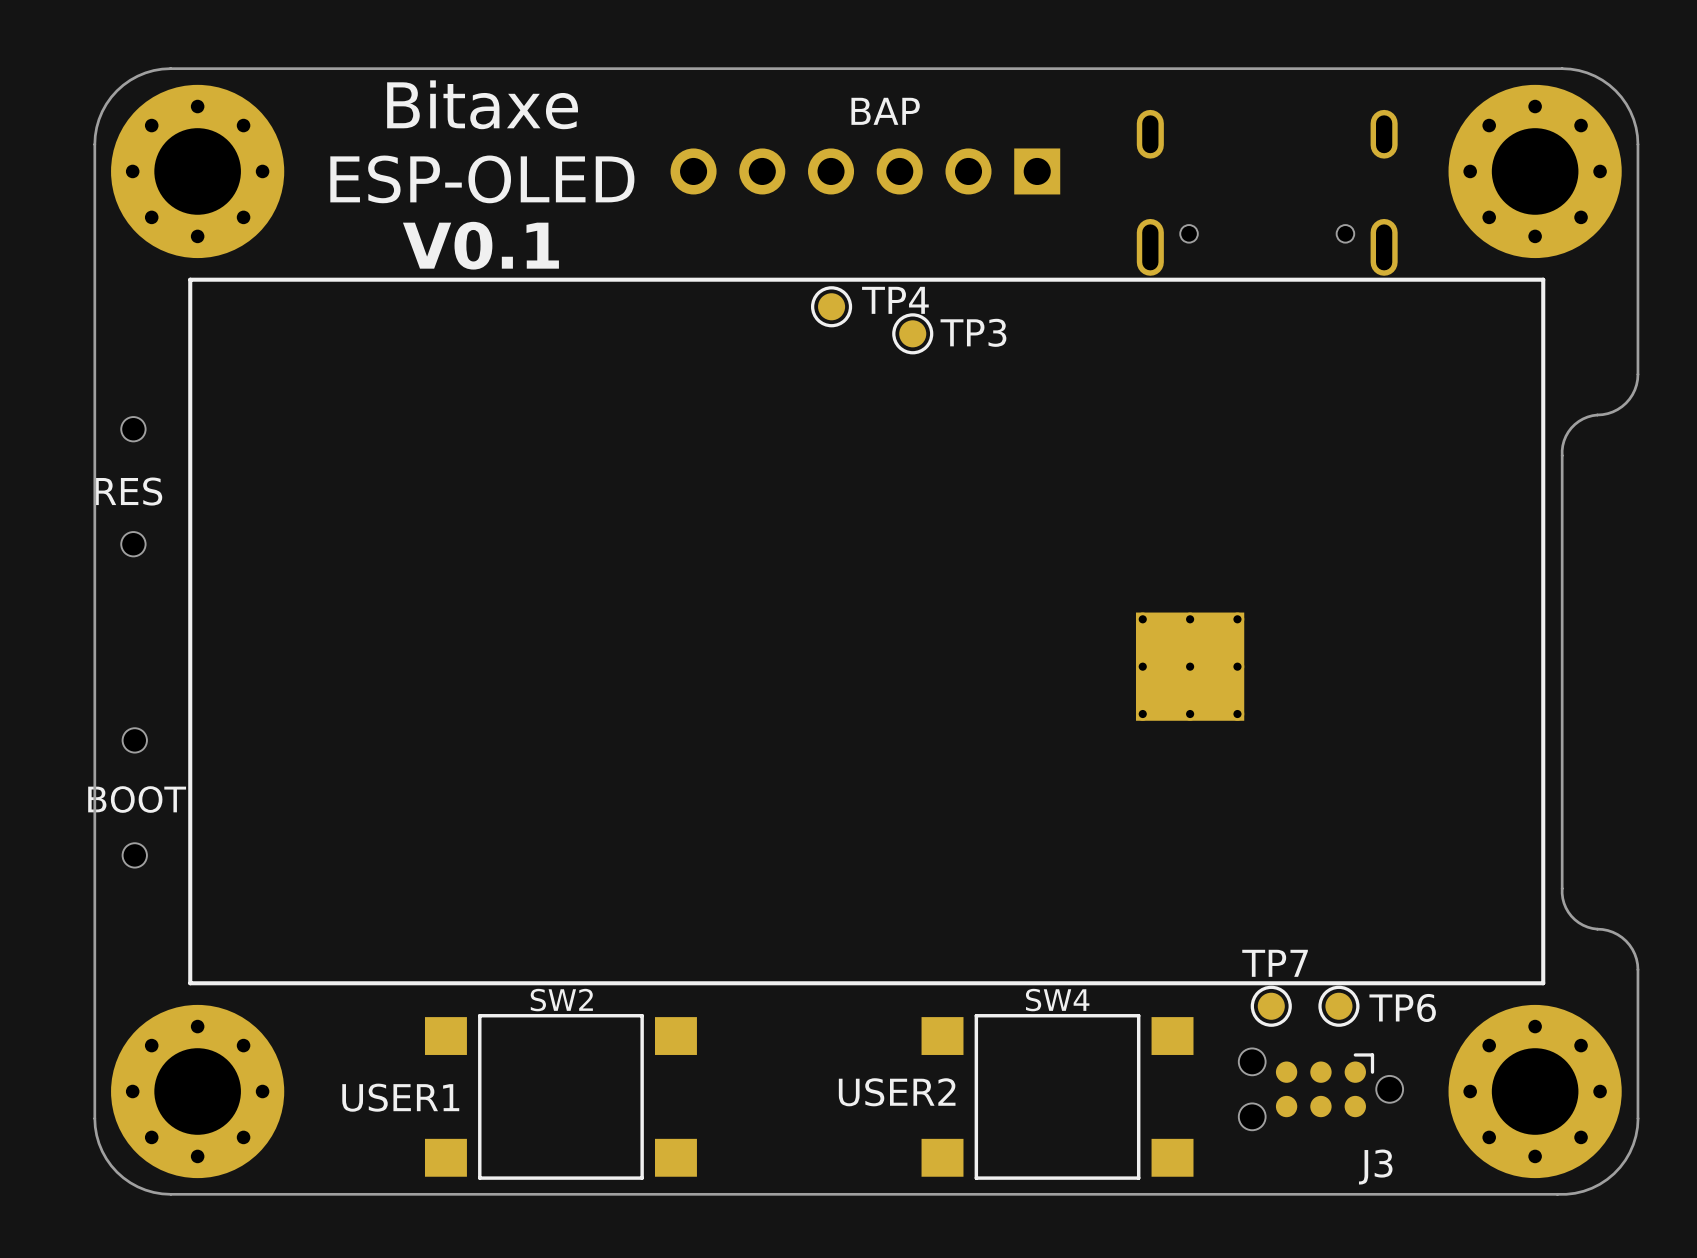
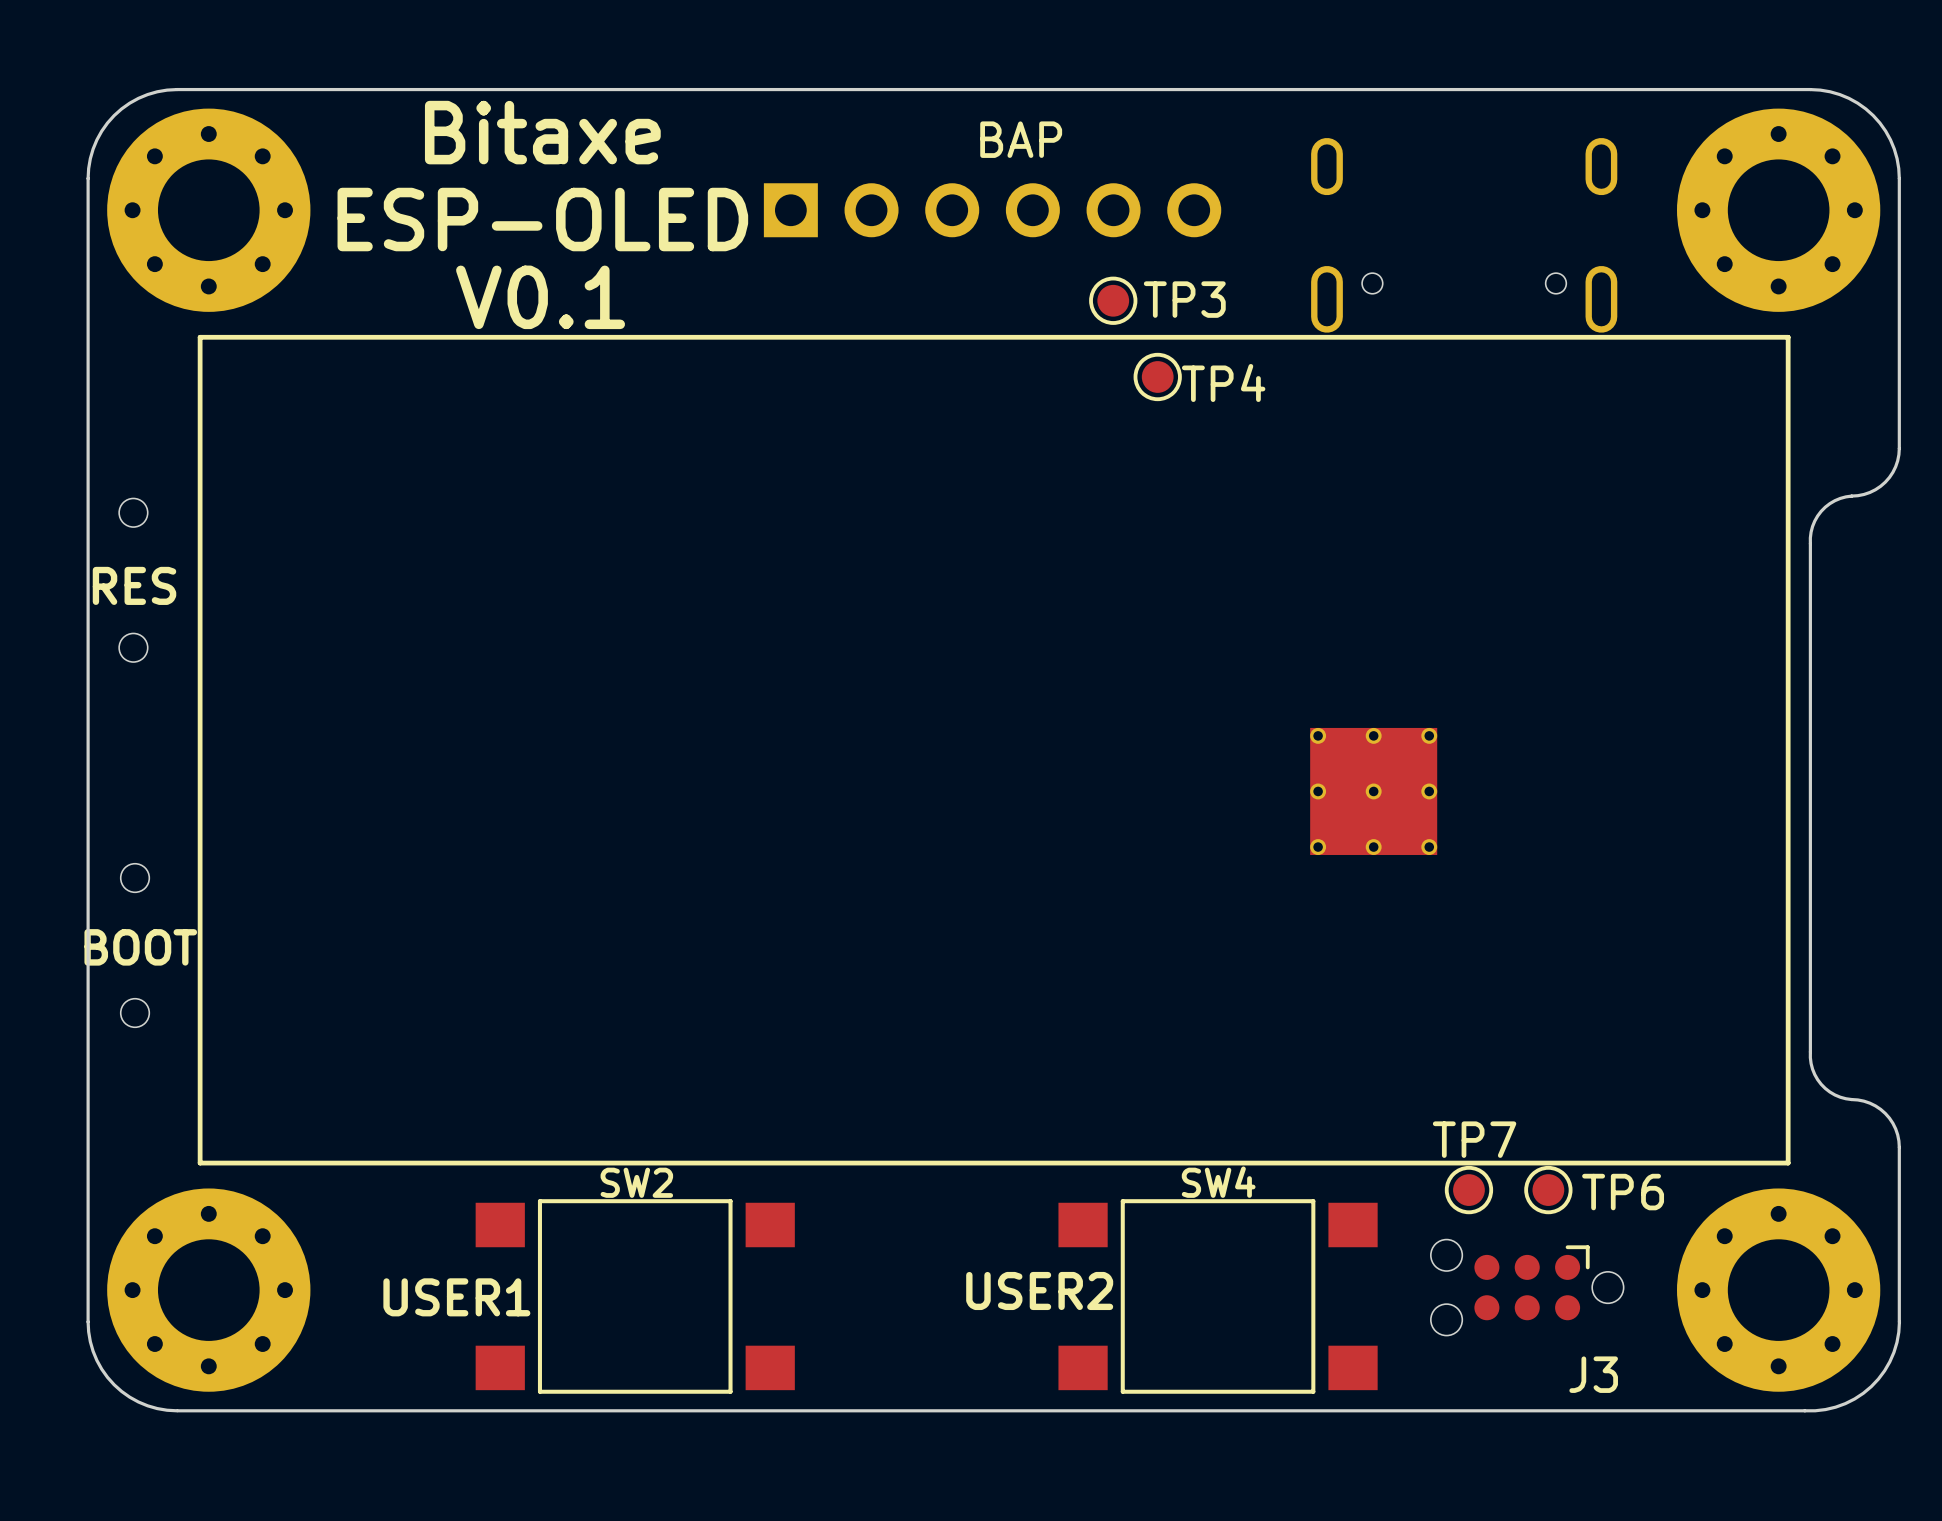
part rotation: 0° (865, 171) -> 180° (992, 210)
TP4 name position: TP4 (895, 300) -> TP4 (1223, 382)
TP4 position: (831, 306) -> (1157, 376)
TP3 position: (912, 333) -> (1113, 300)

